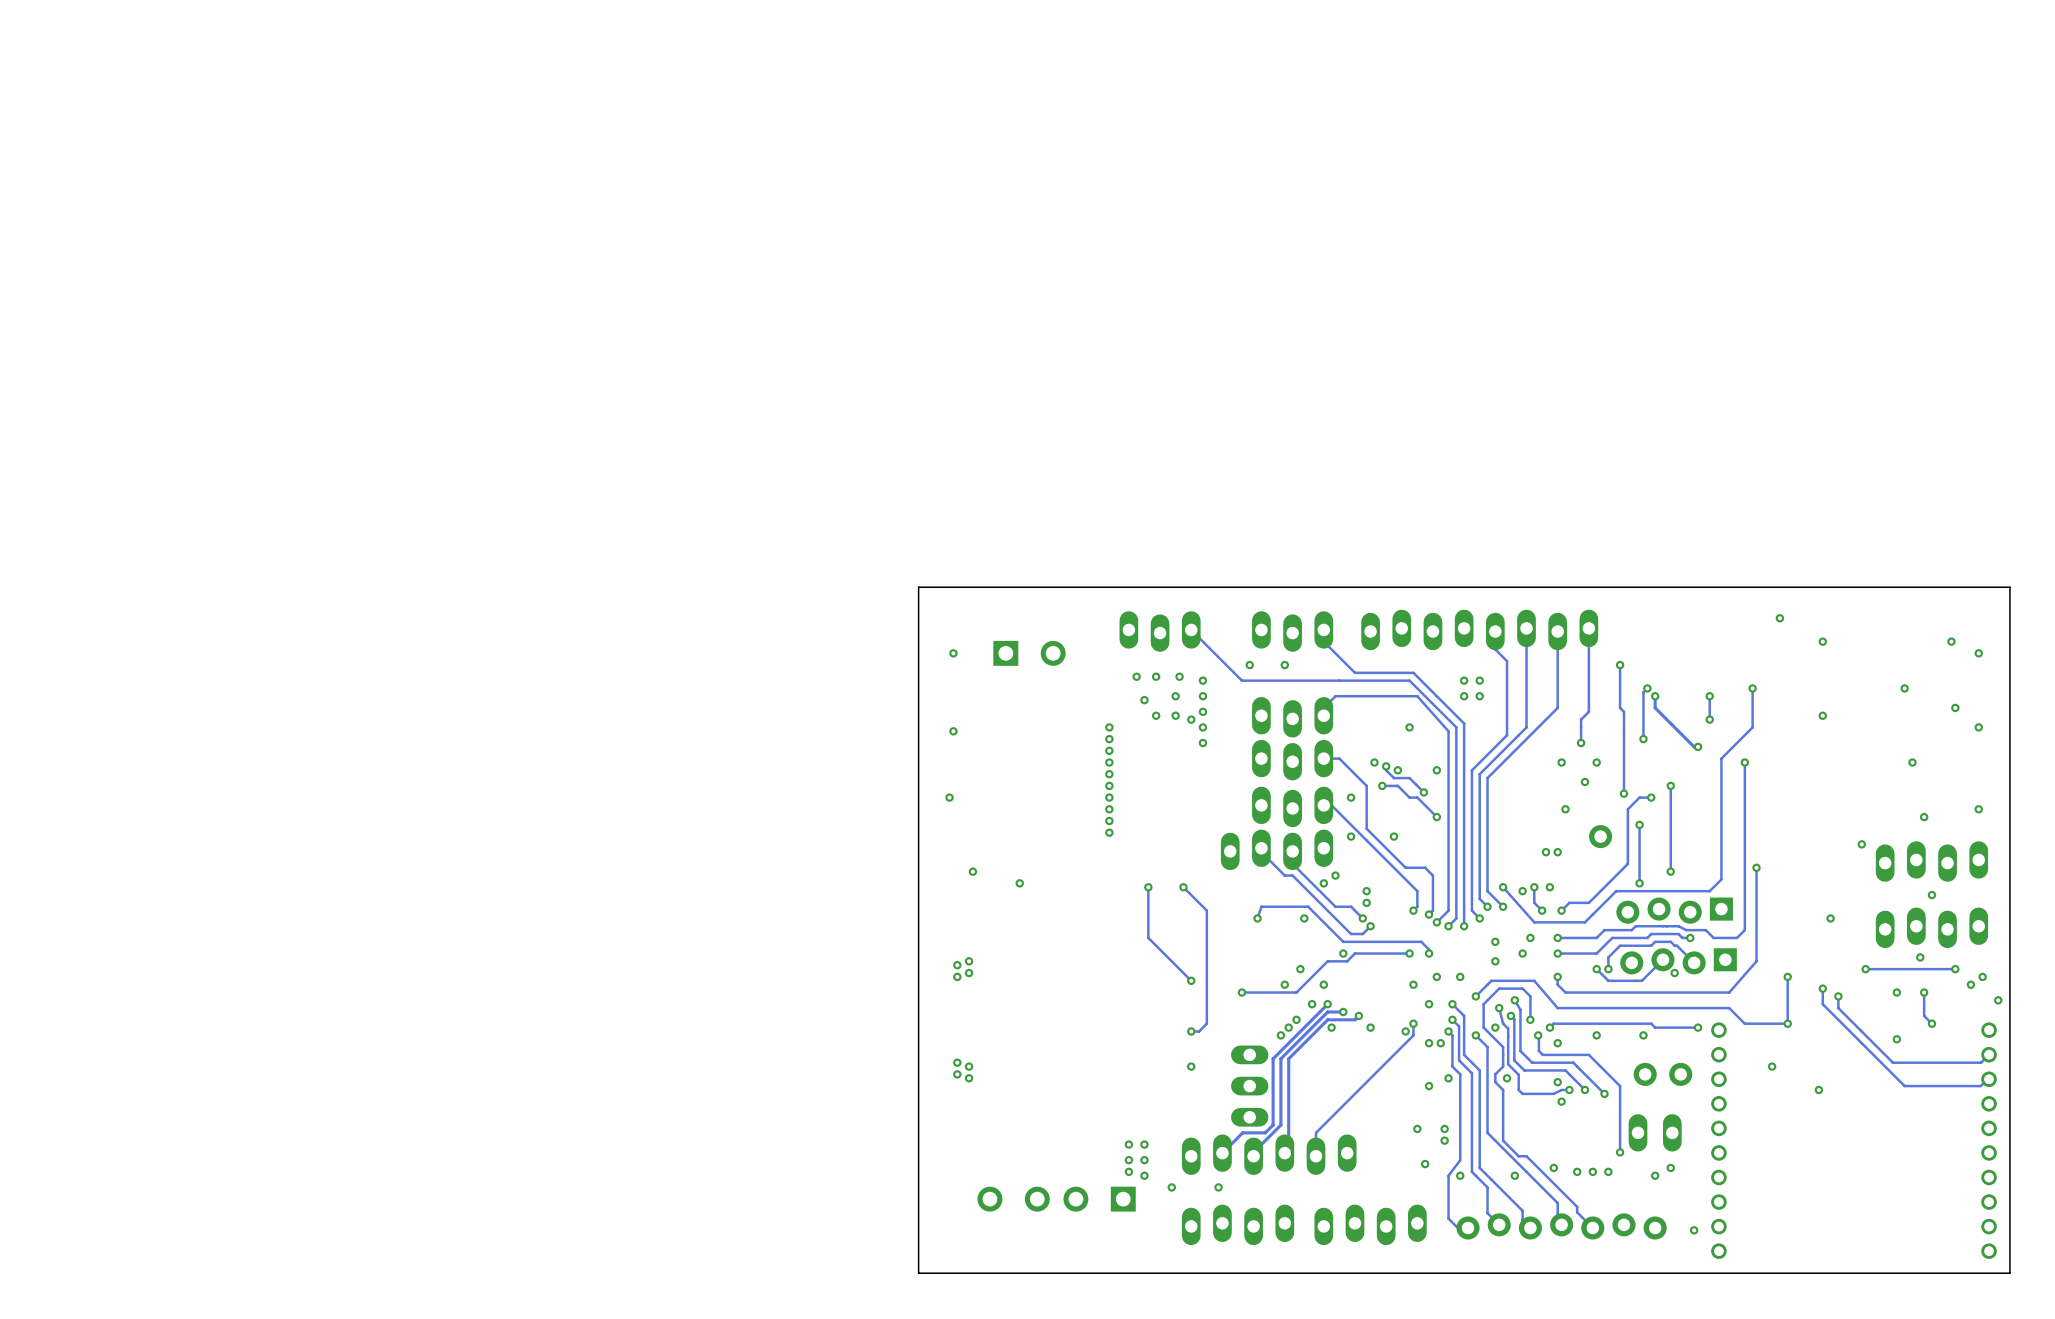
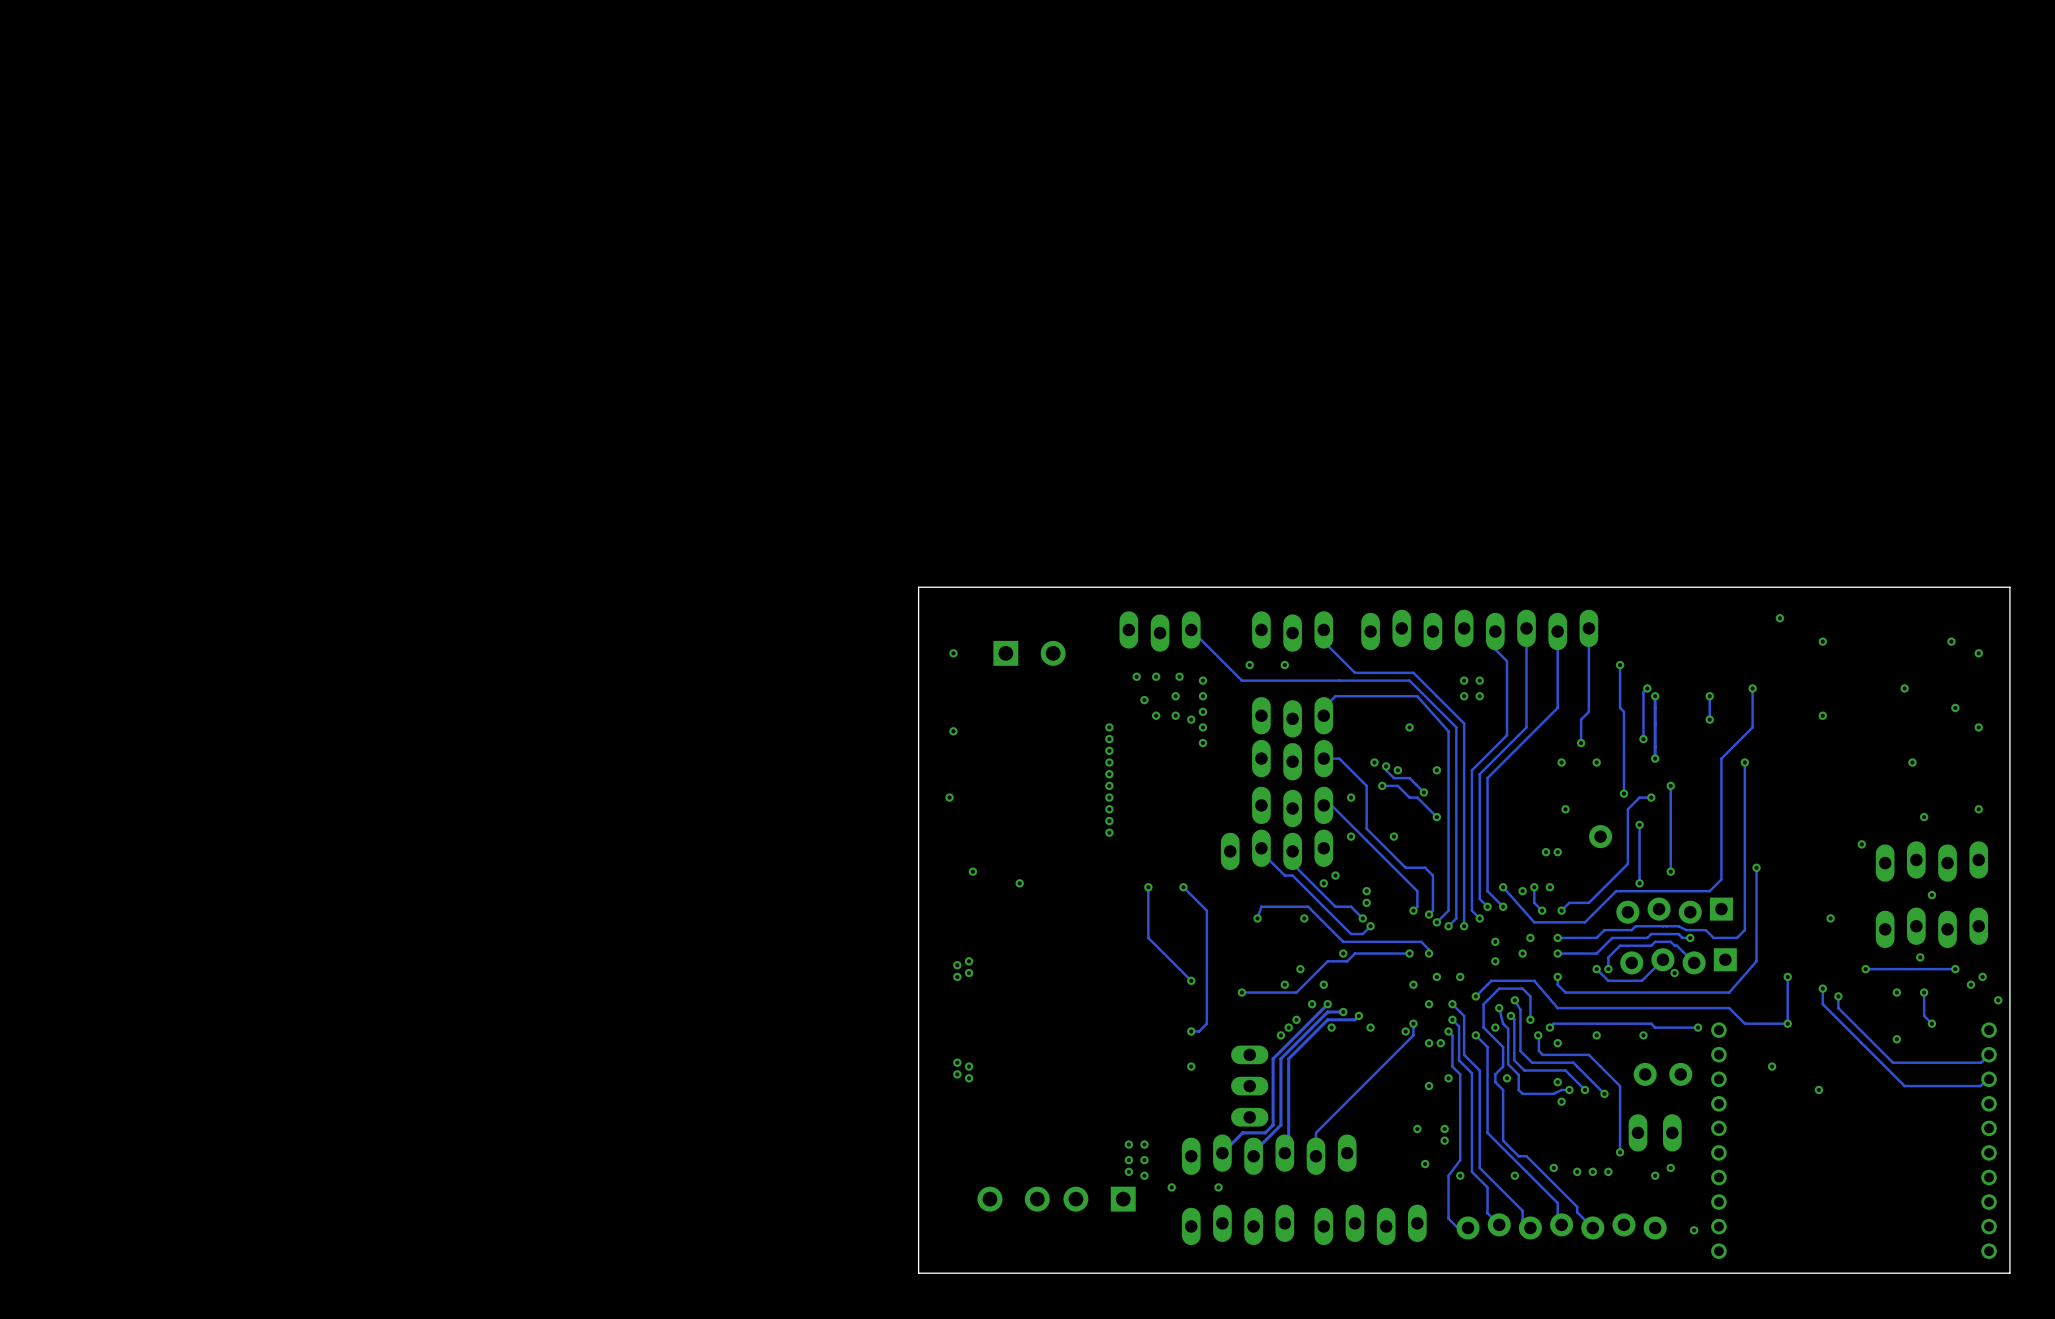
track: (1655, 707) (1694, 746) (1698, 746) -> (1655, 707) (1655, 758)
via: (1698, 746) -> none
via: none -> (1655, 758)
via: (1584, 782) -> none

